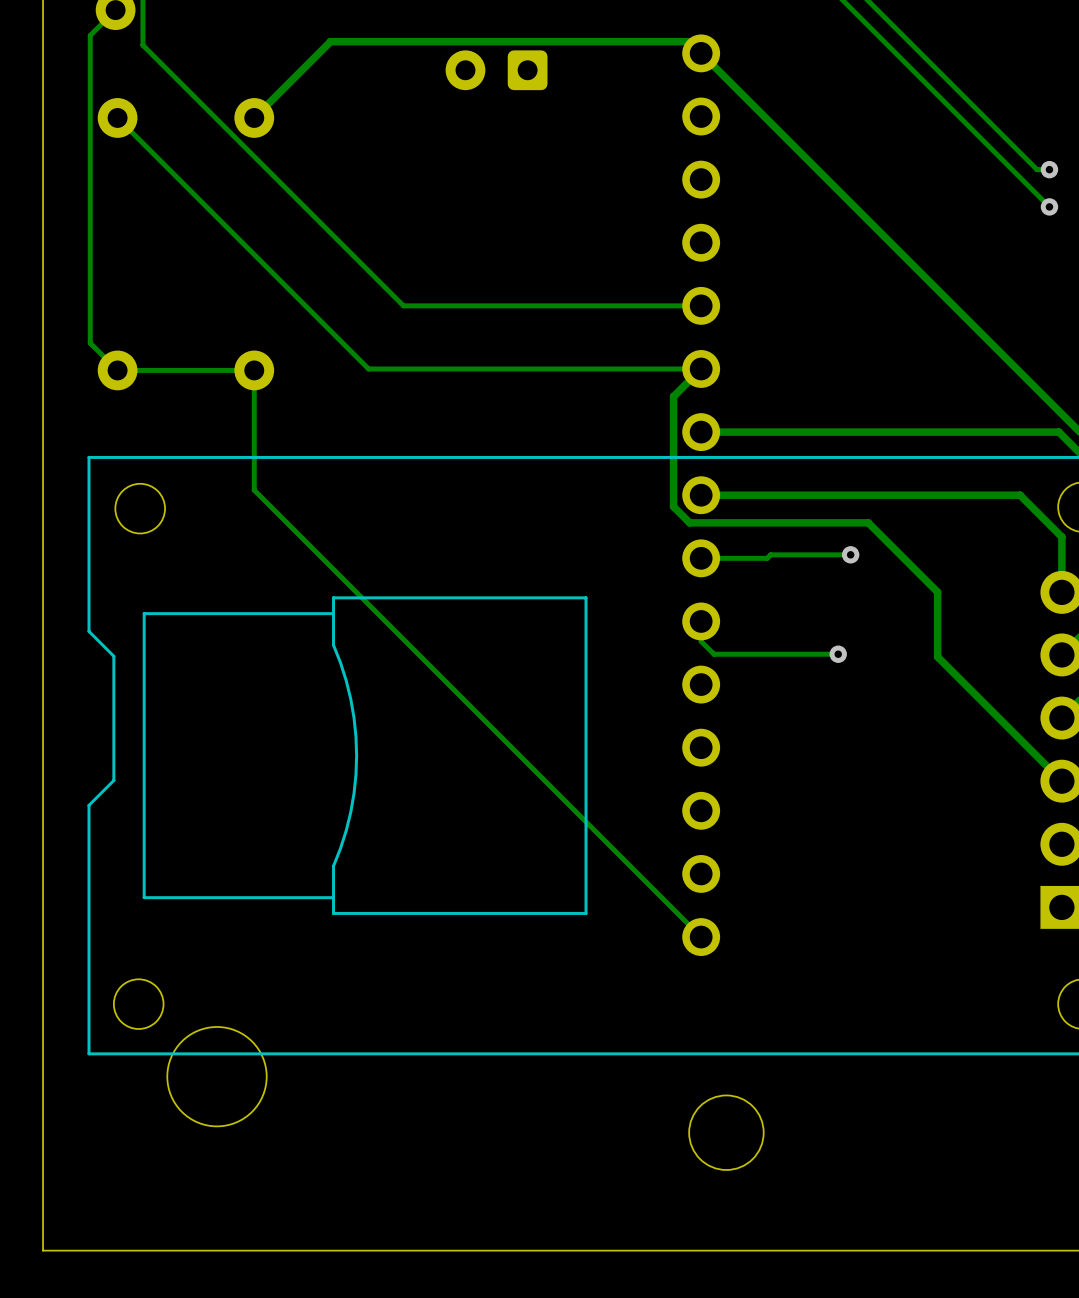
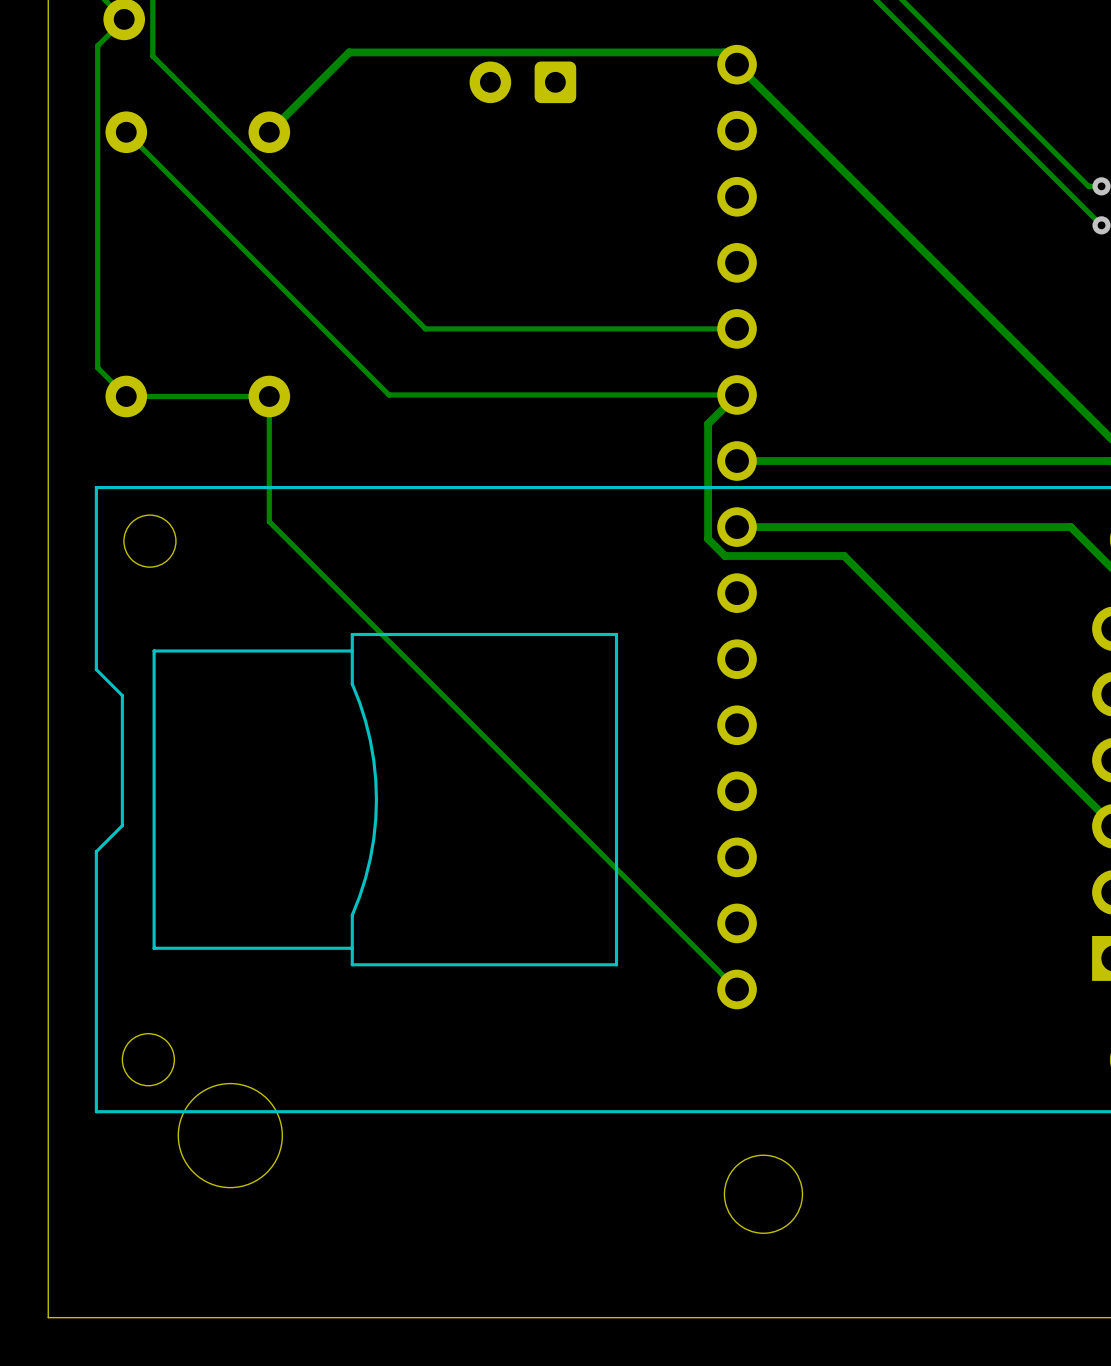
track: (803, 522) (868, 522) (937, 592) (937, 656) -> (844, 555) (984, 696)
track: (850, 554) (770, 554) (767, 558) (701, 558) -> none
via: (850, 554) -> none
track: (701, 621) (701, 641) (713, 654) (838, 654) -> none
via: (838, 654) -> none

